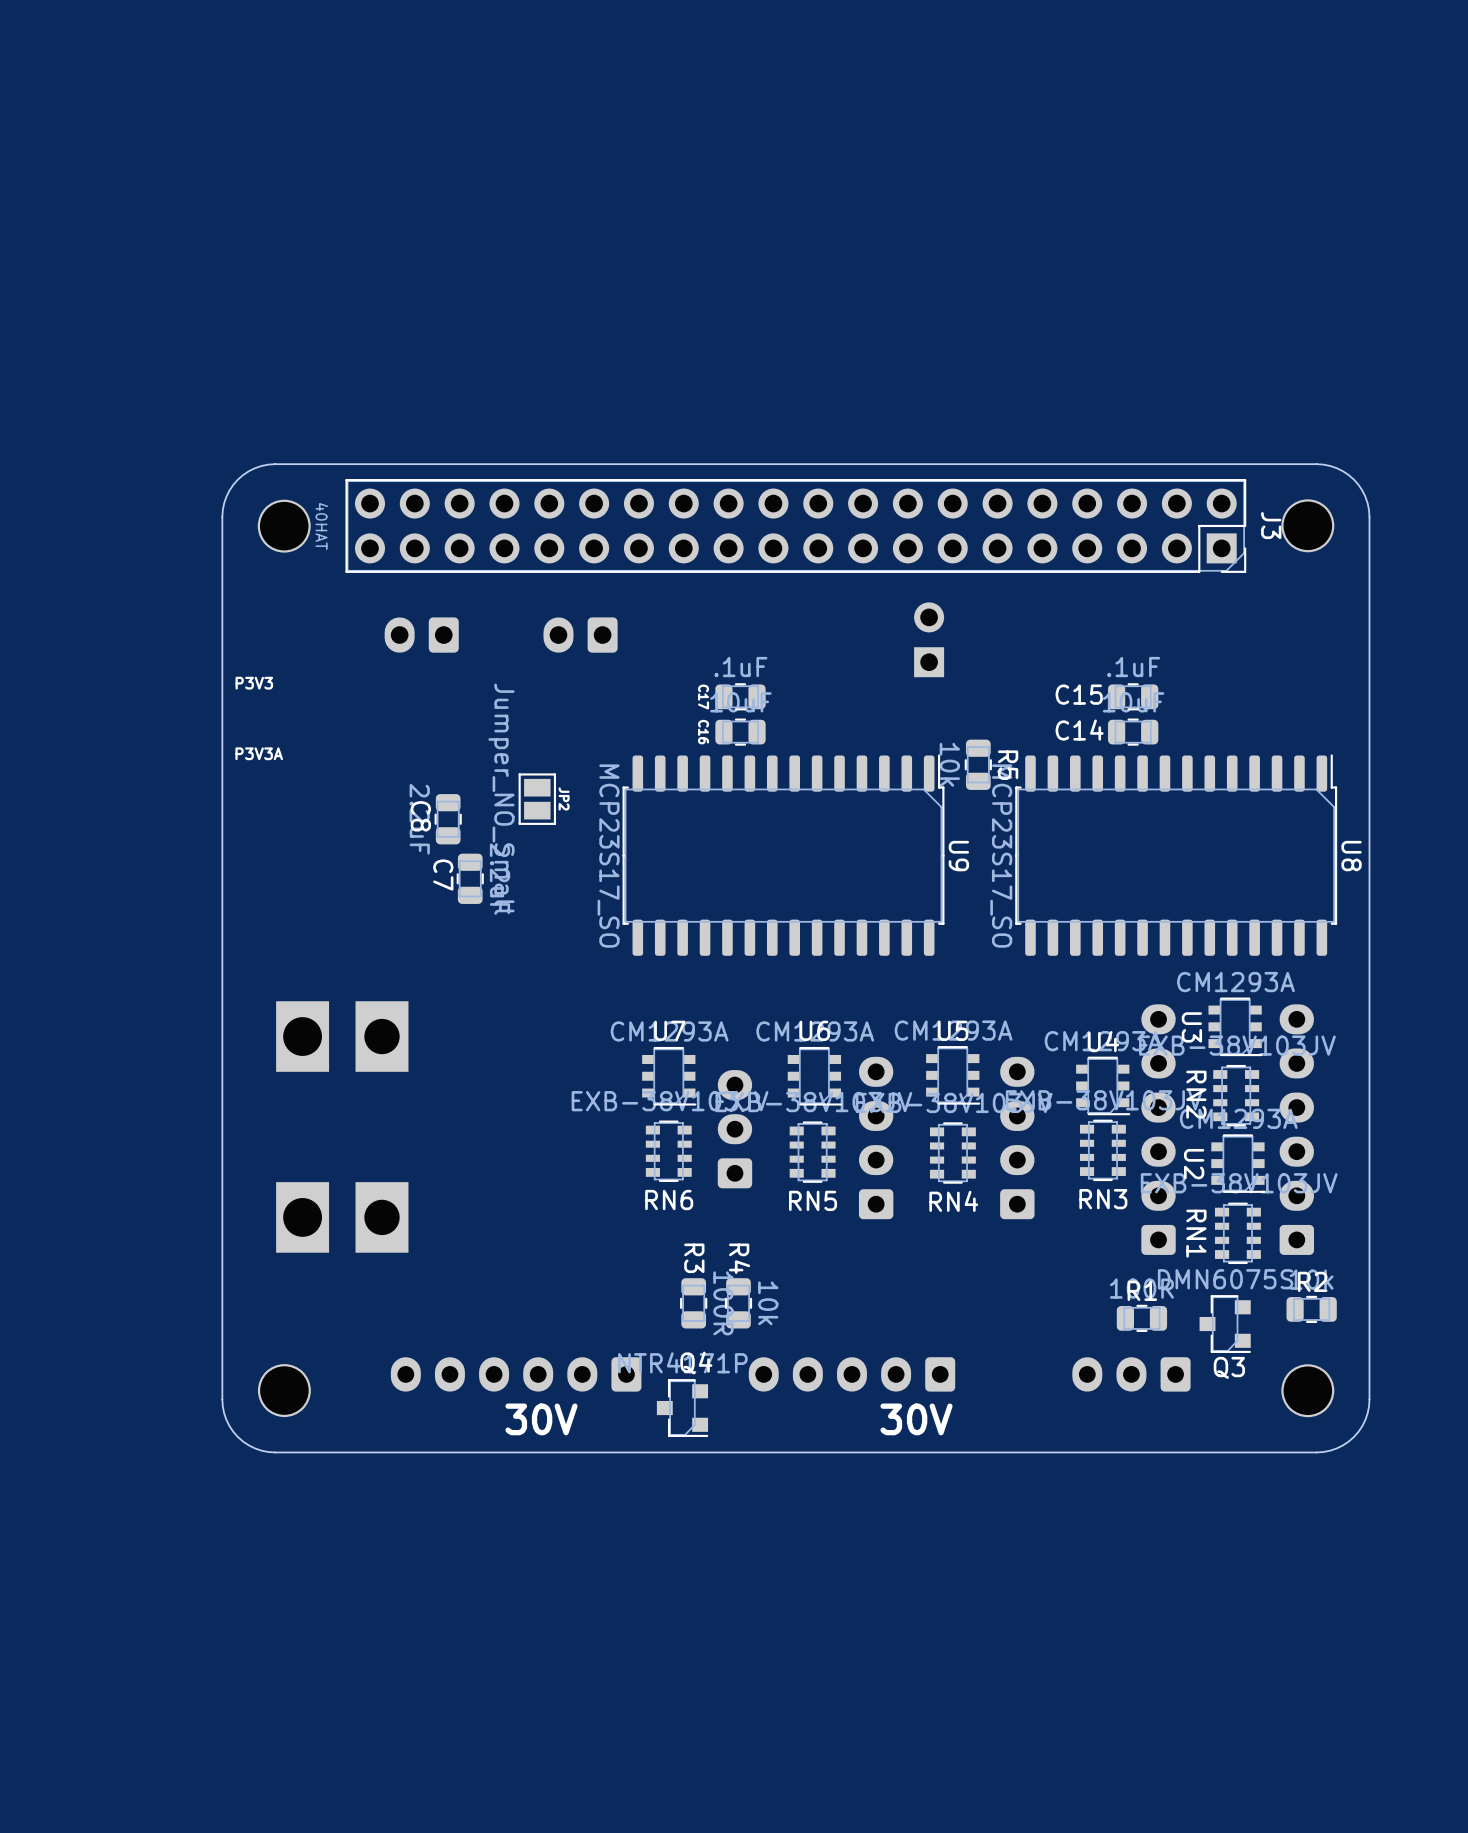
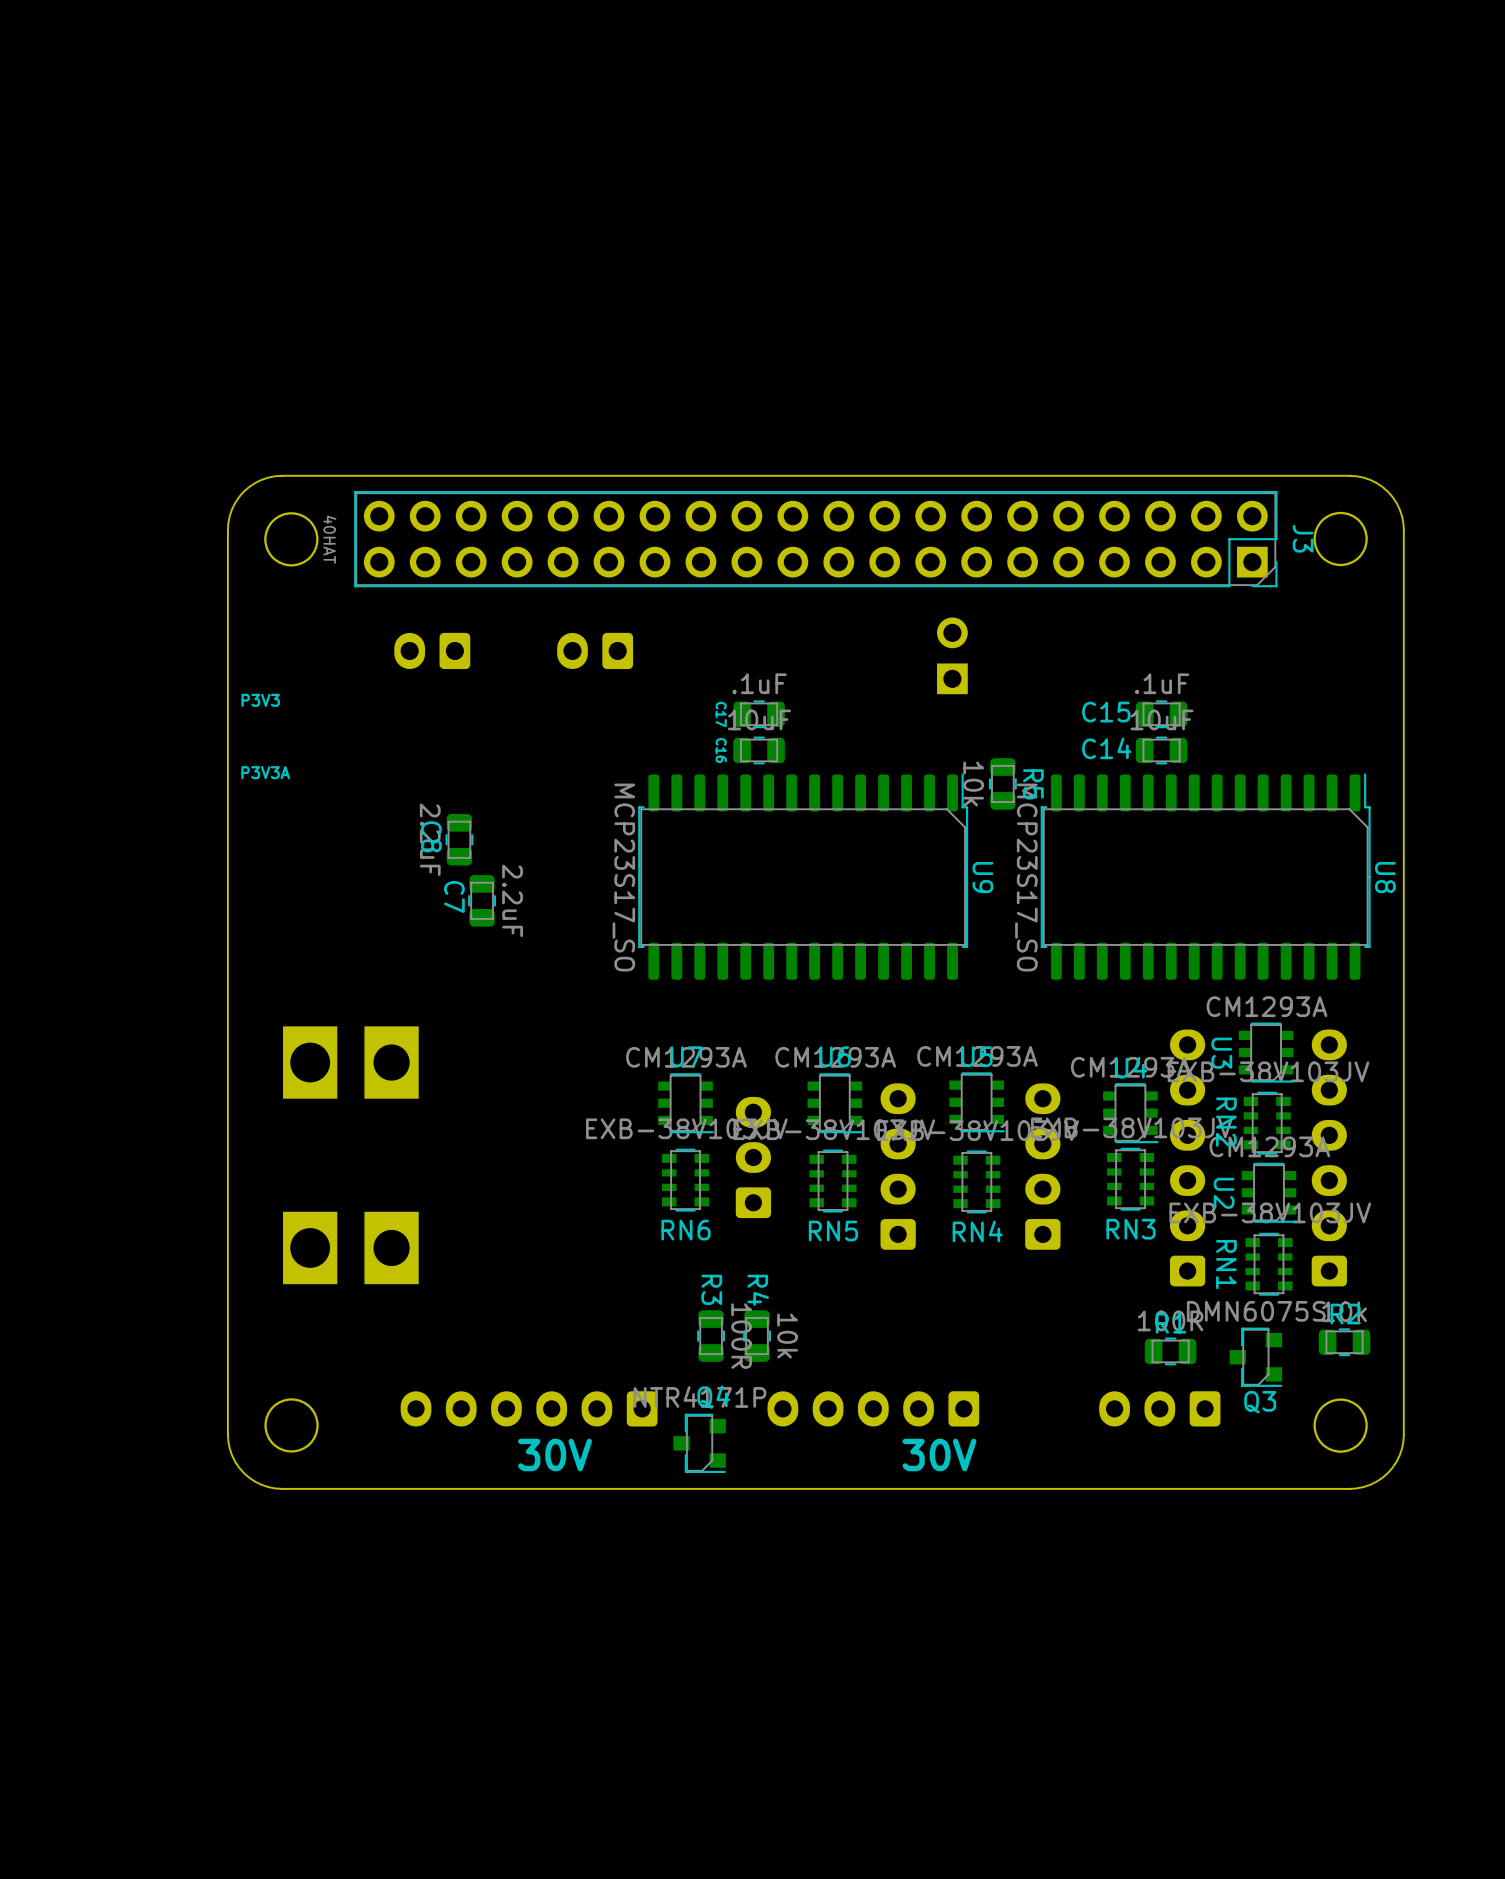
JP2: Jumper_NO_Small (537, 799) -> none

